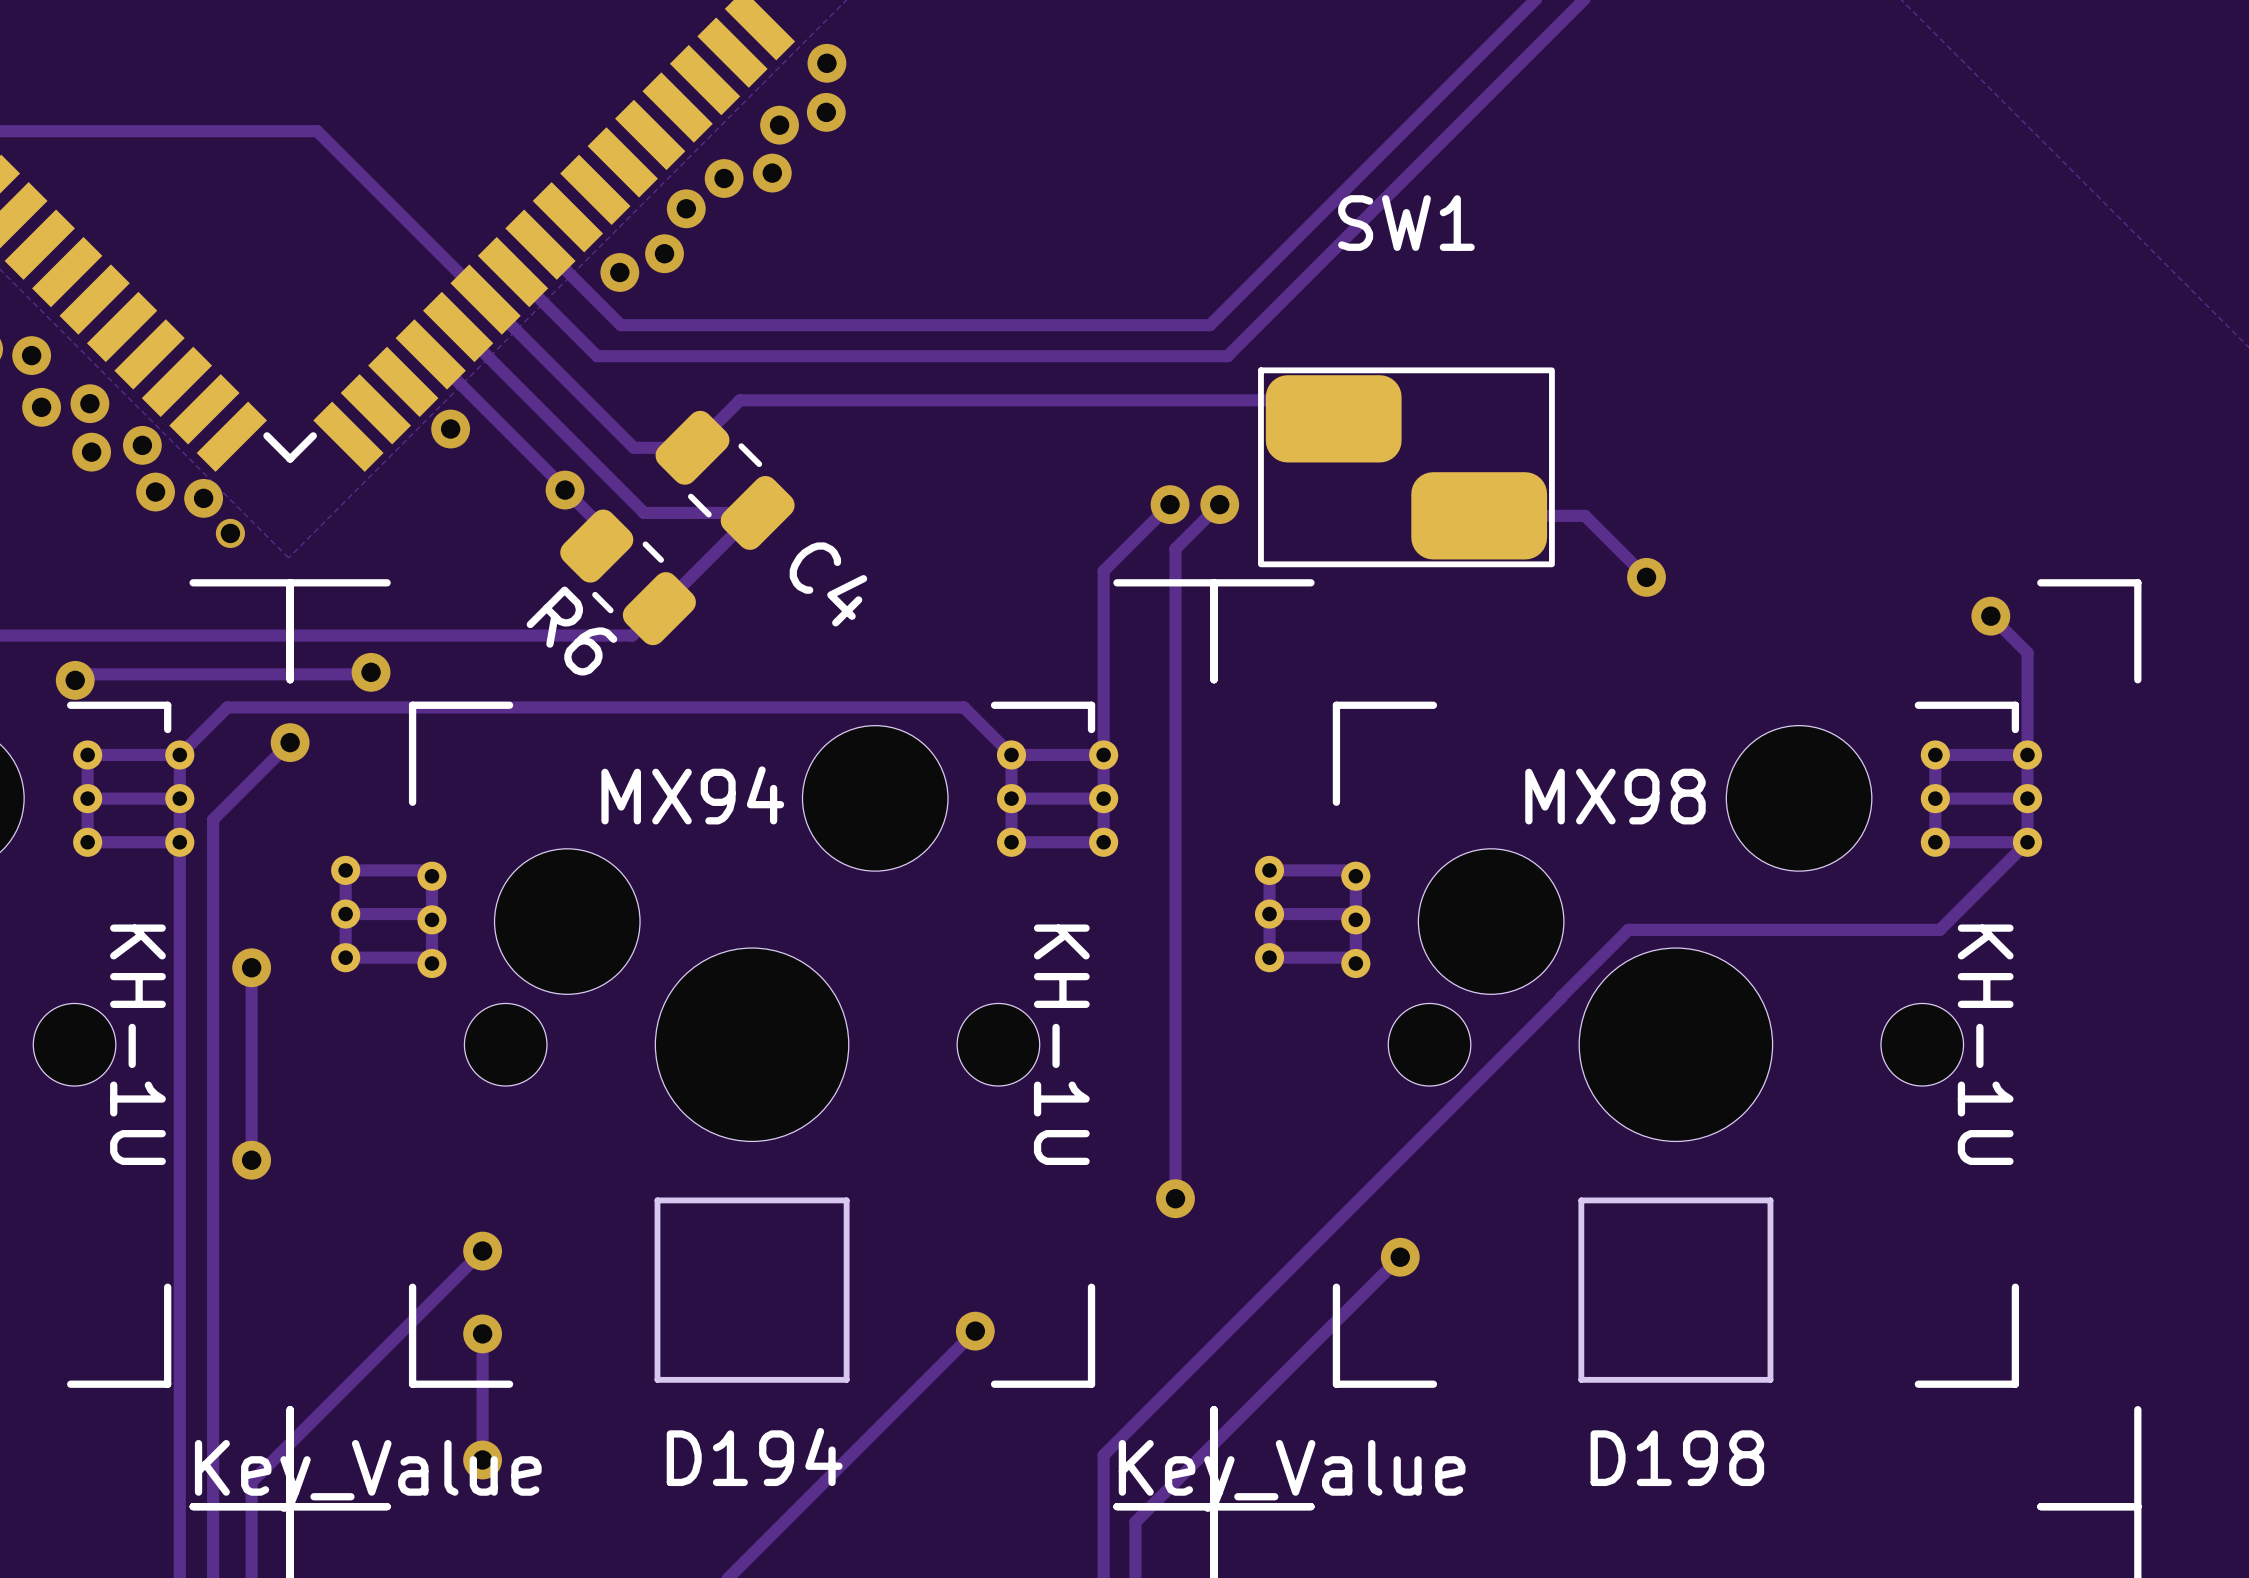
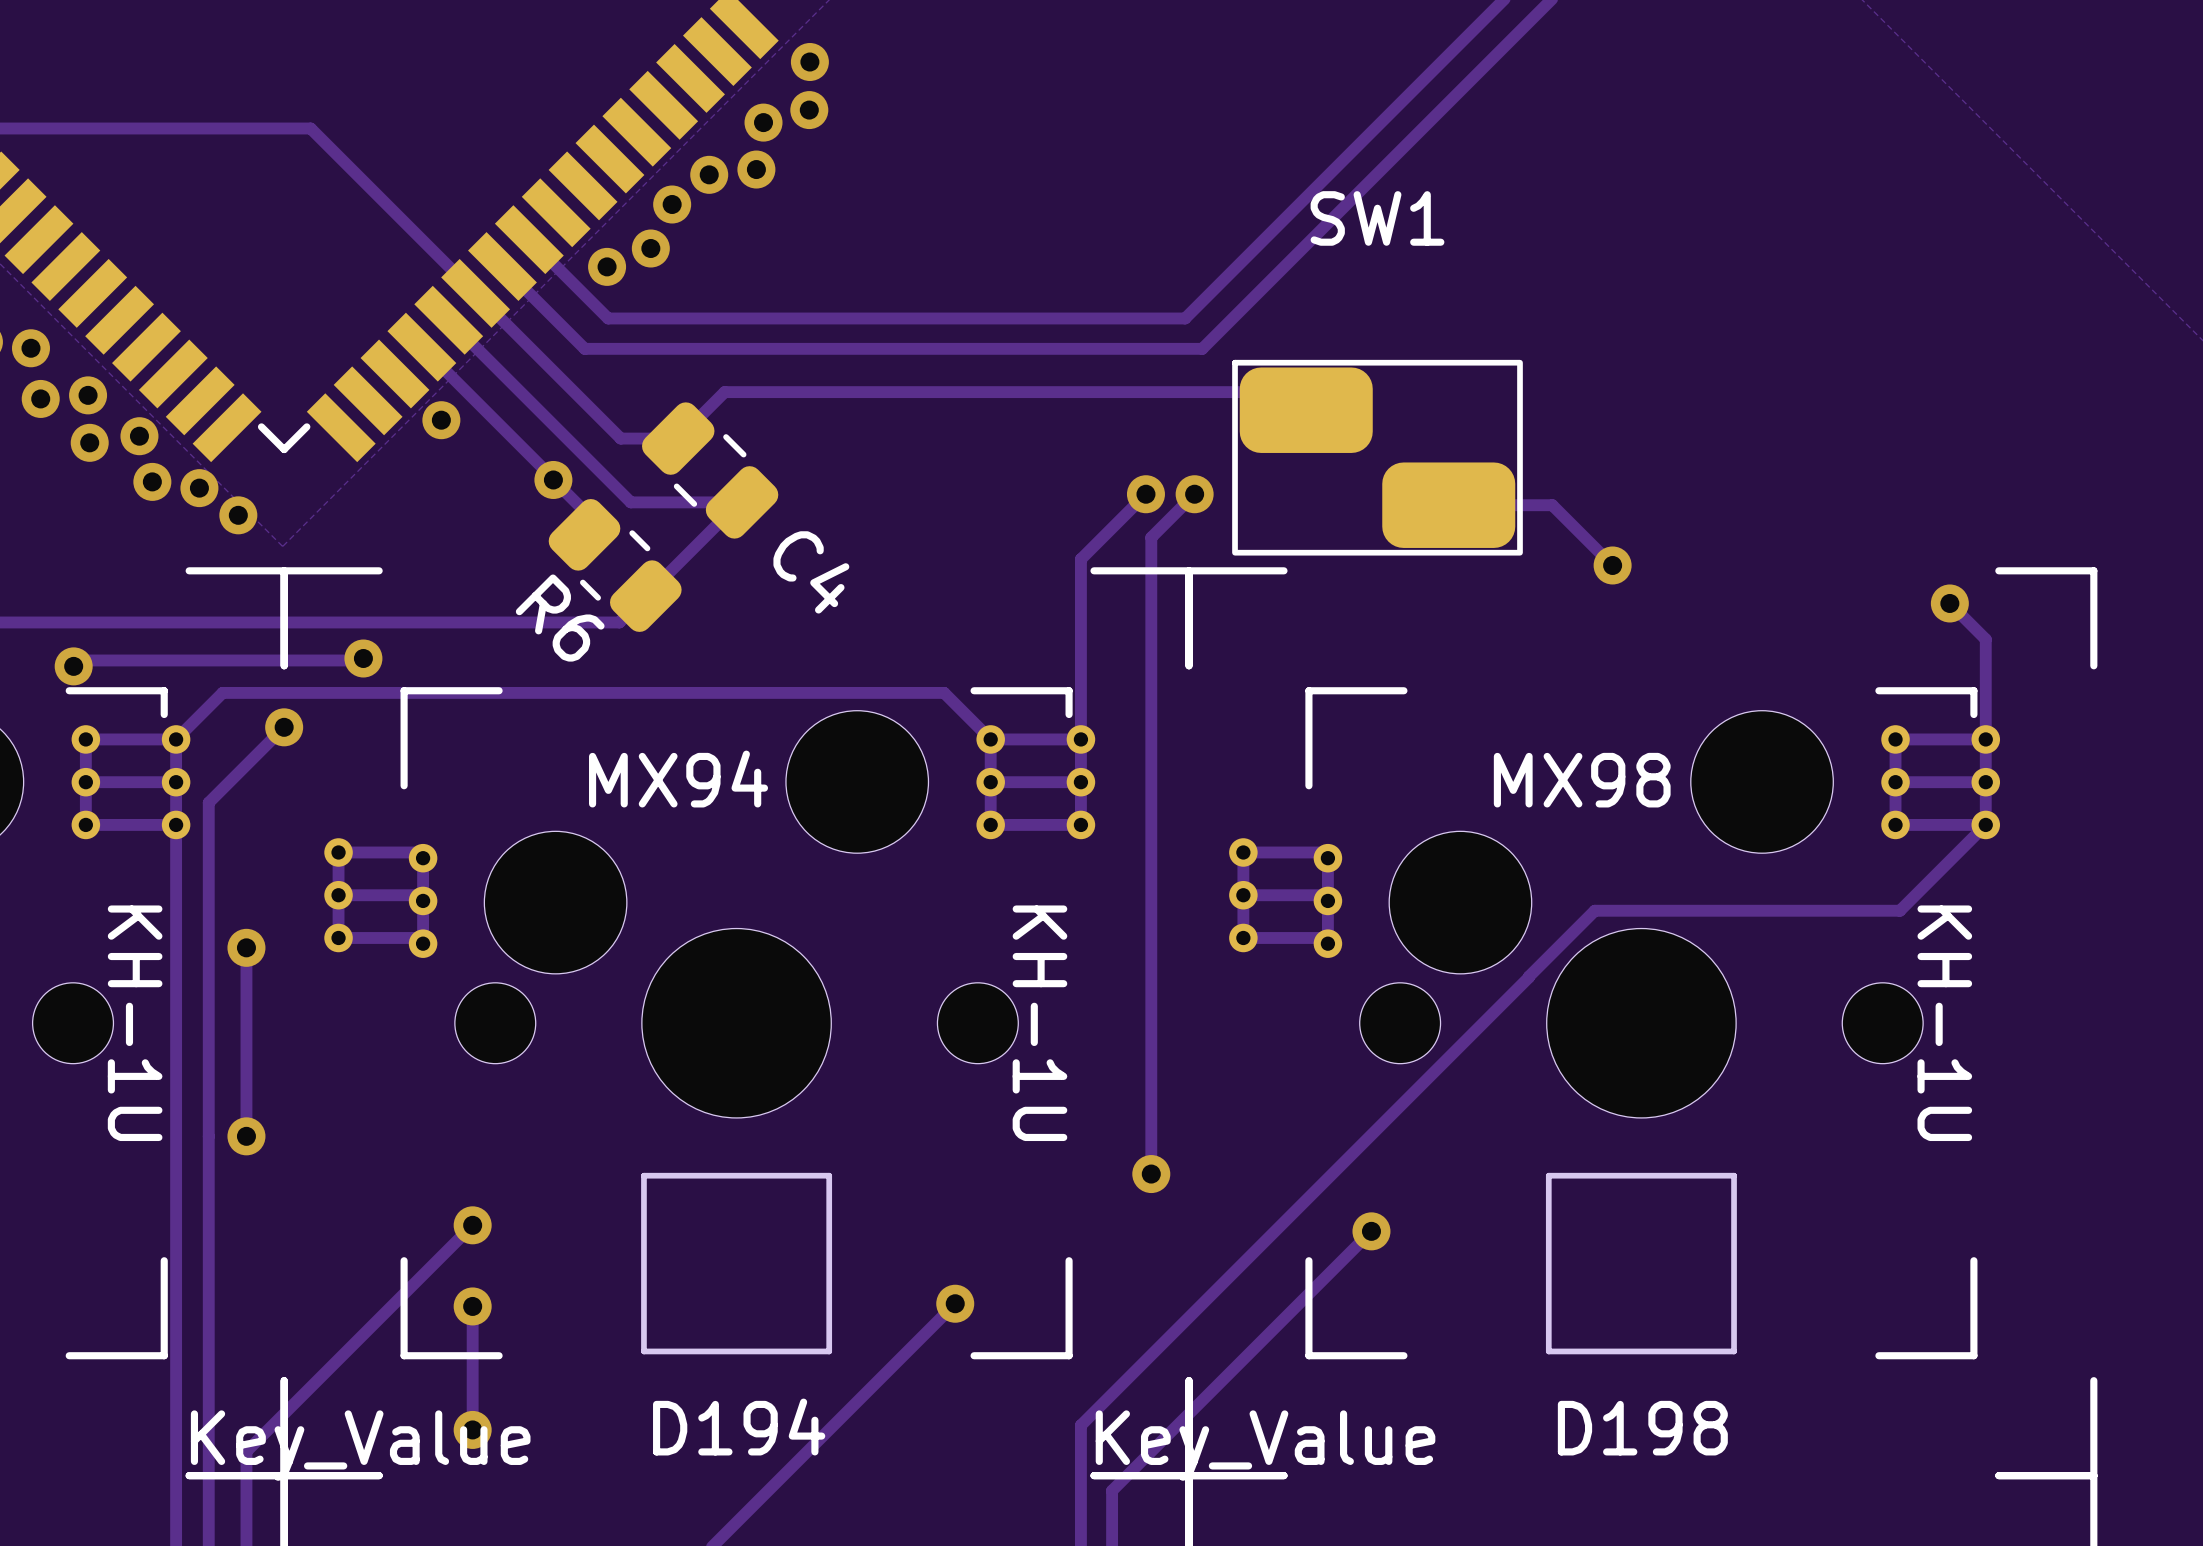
via size: [215, 518, 245, 548] -> [219, 496, 258, 535]

